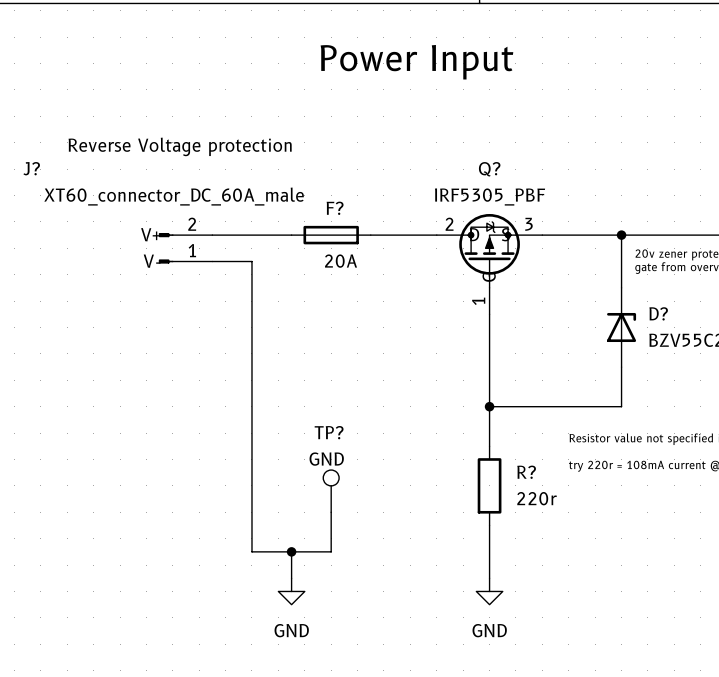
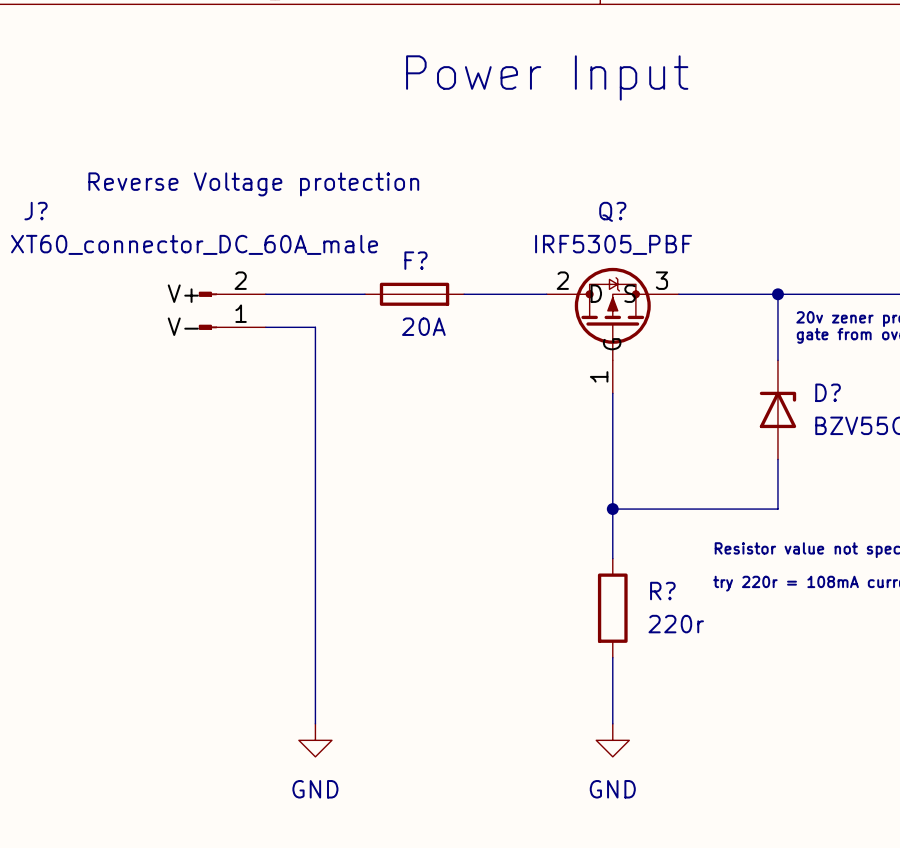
TP?: GND (331, 491) -> none
wire: (331, 512) (331, 551) (251, 551) -> (315, 723) (315, 690)
wire: (291, 551) (291, 578) -> none
junction: (291, 551) -> none
power symbol position: GND (291, 591) -> GND (315, 740)

